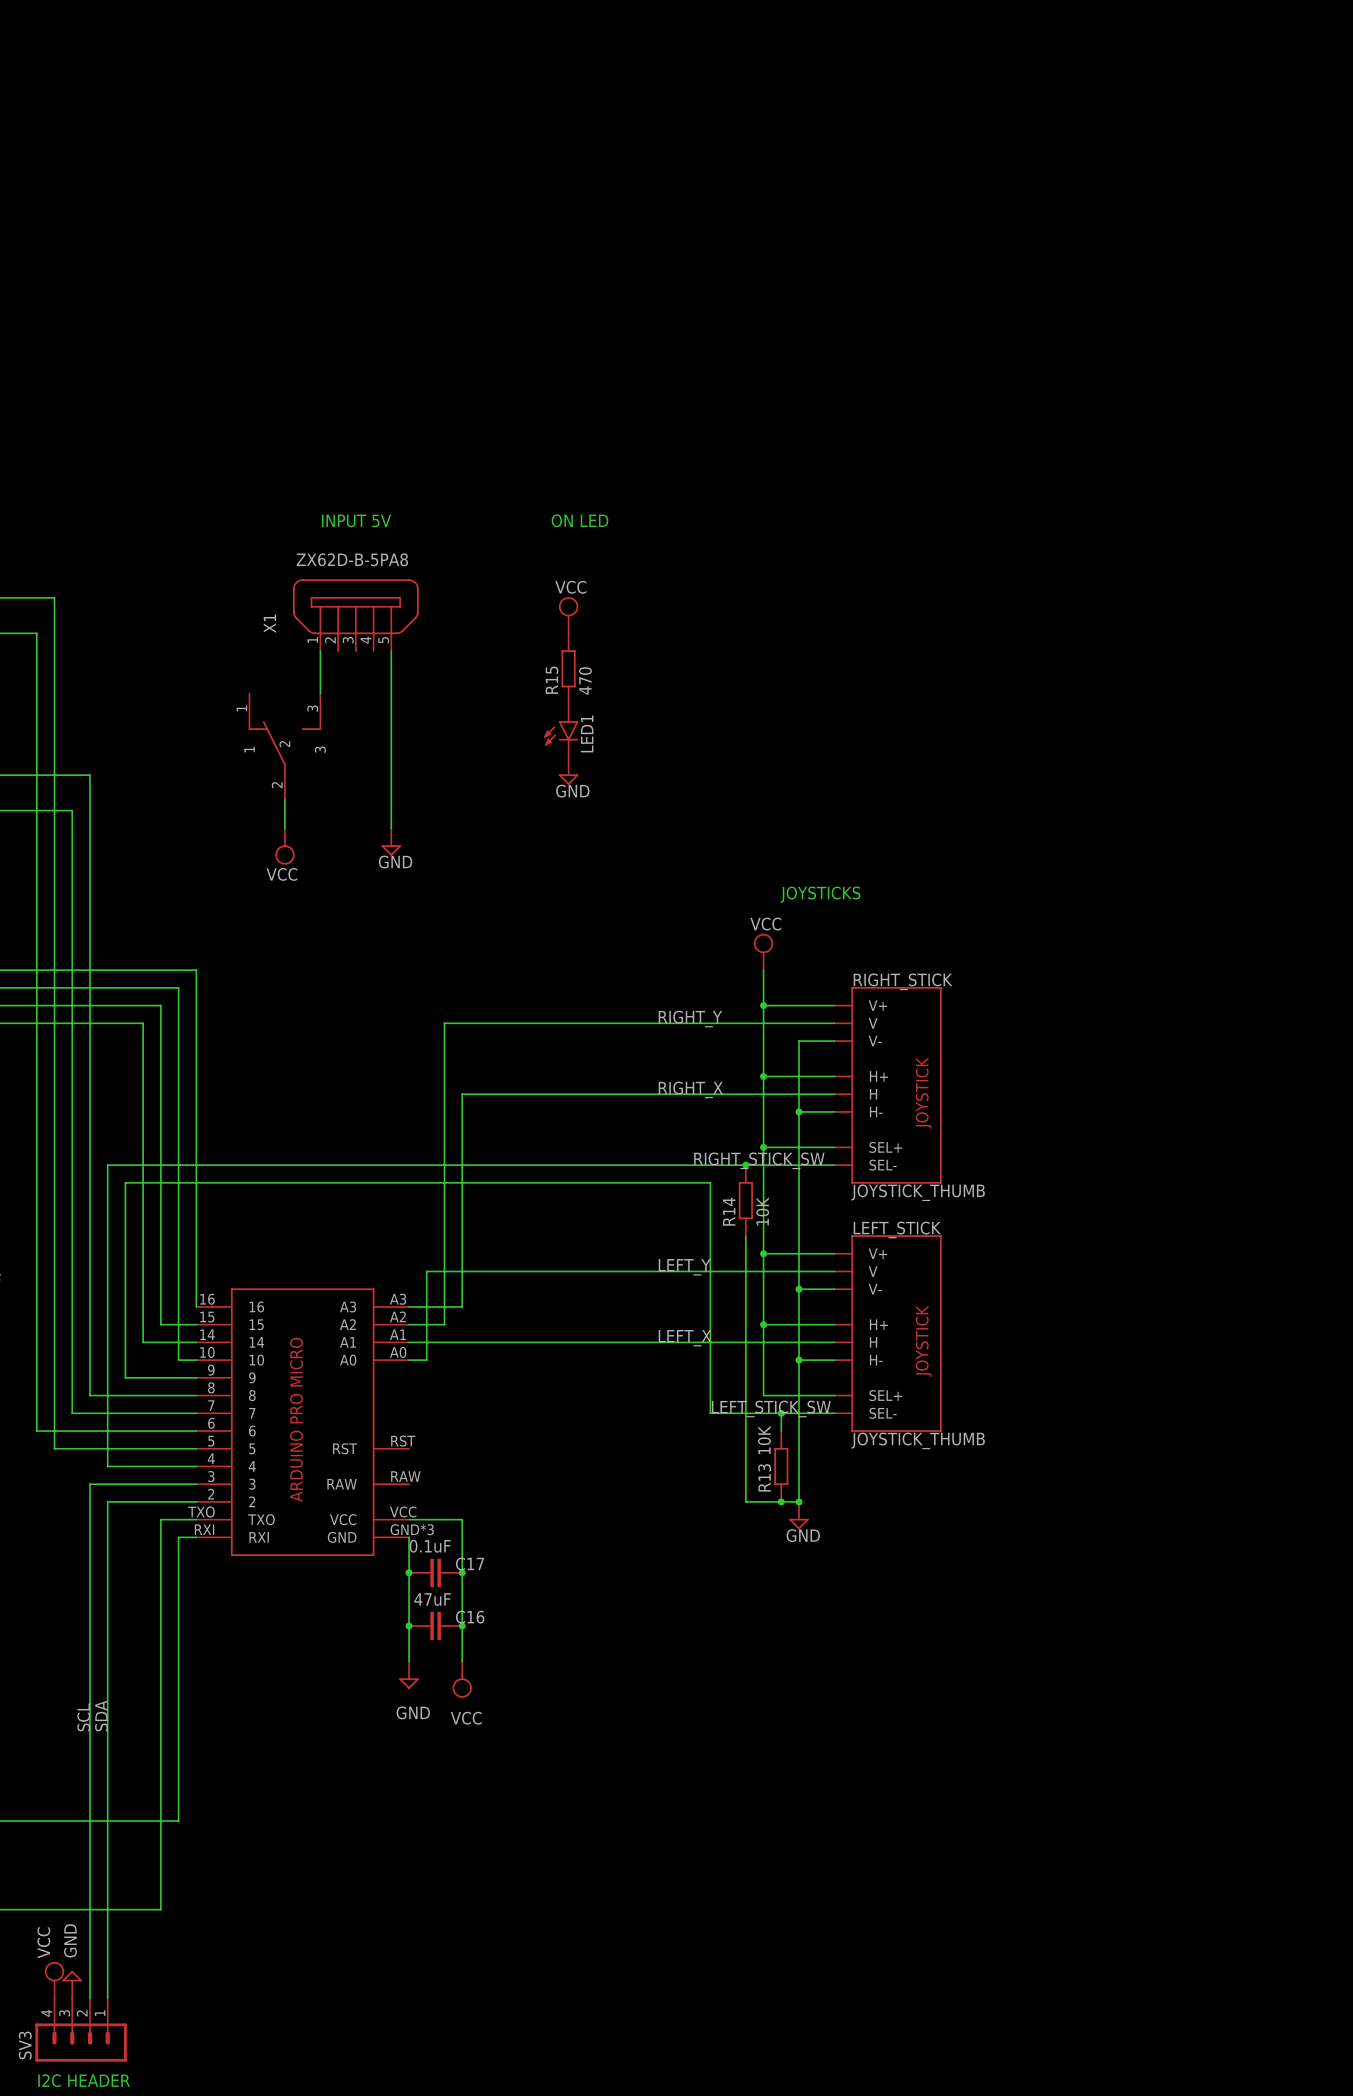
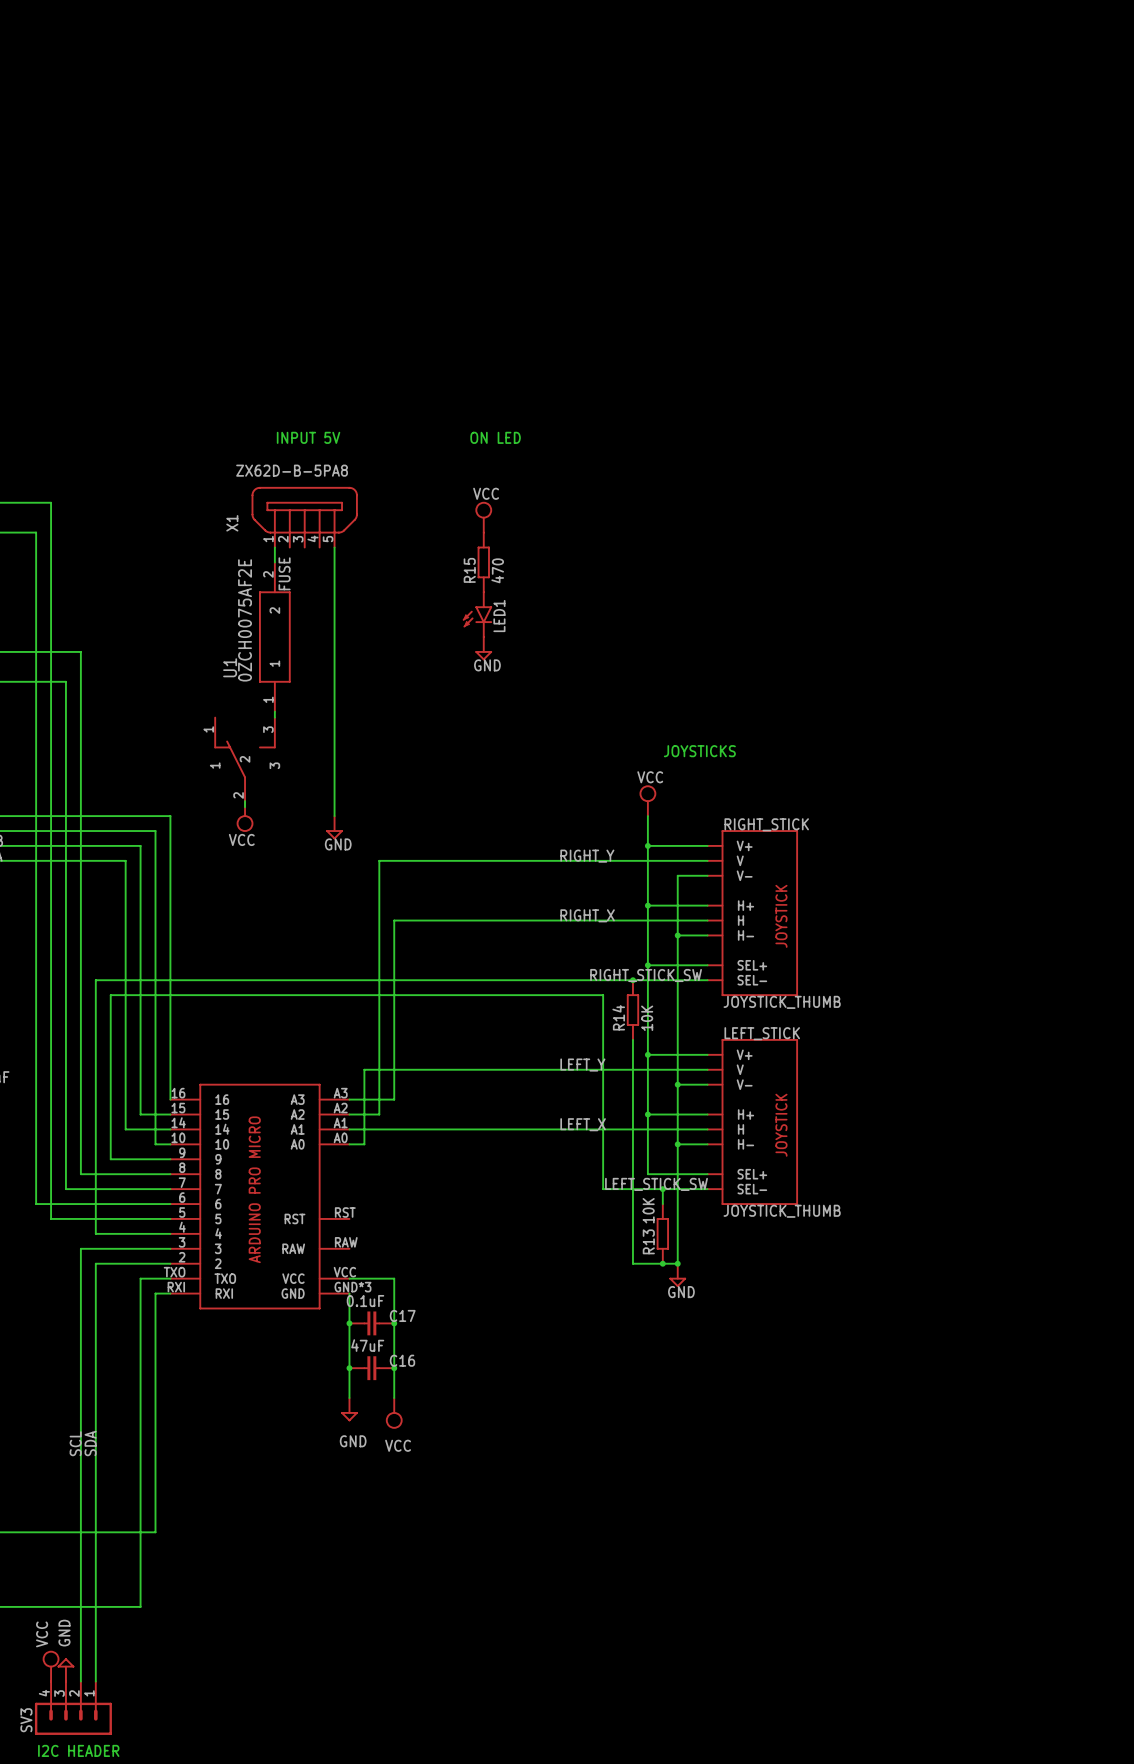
label: none -> FUSE (284, 573)
part position: (284, 746) -> (245, 762)
U1: none -> 0ZCH0075AF2E (274, 637)
wire: (284, 799) (284, 828) -> none
wire: none -> (334, 696) (334, 816)
power symbol position: GND (391, 842) -> GND (334, 827)
power symbol position: VCC (284, 846) -> VCC (245, 816)
wire: none -> (274, 711) (274, 717)
wire: none -> (245, 801) (245, 807)

